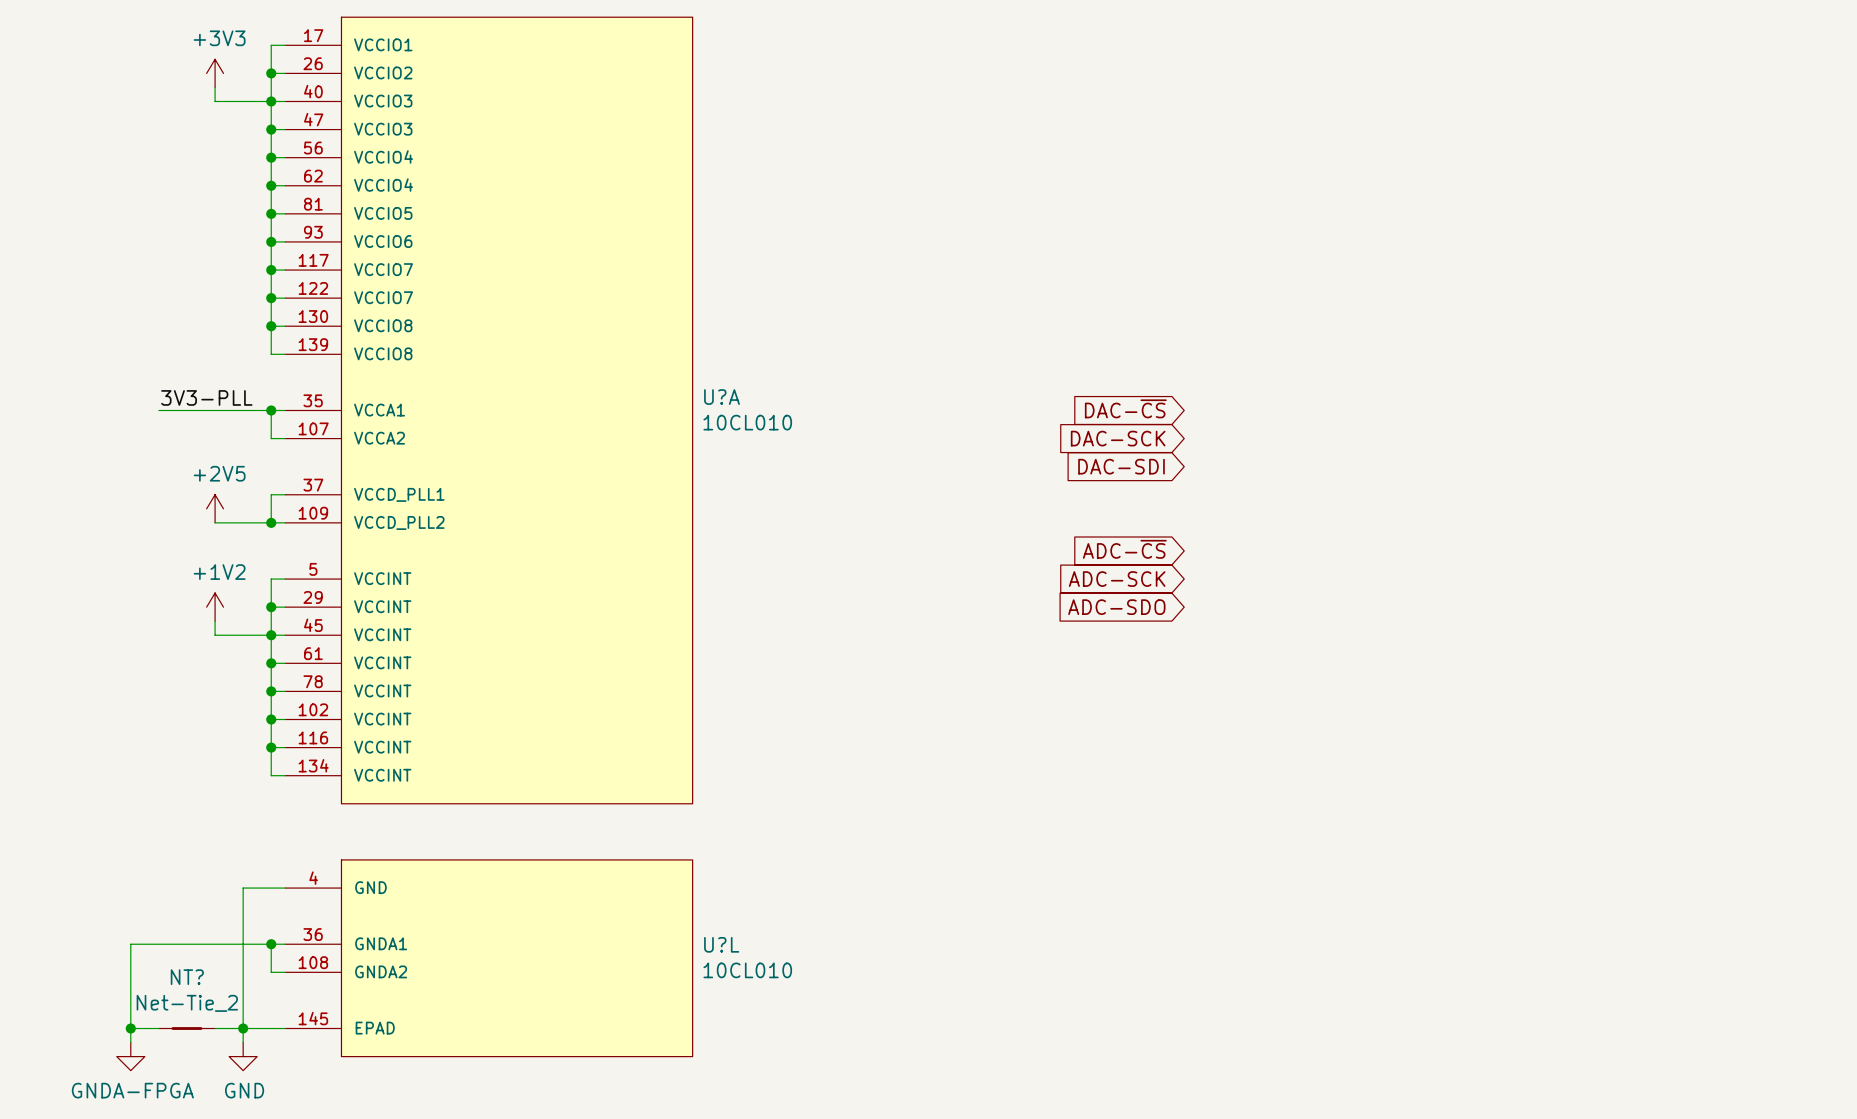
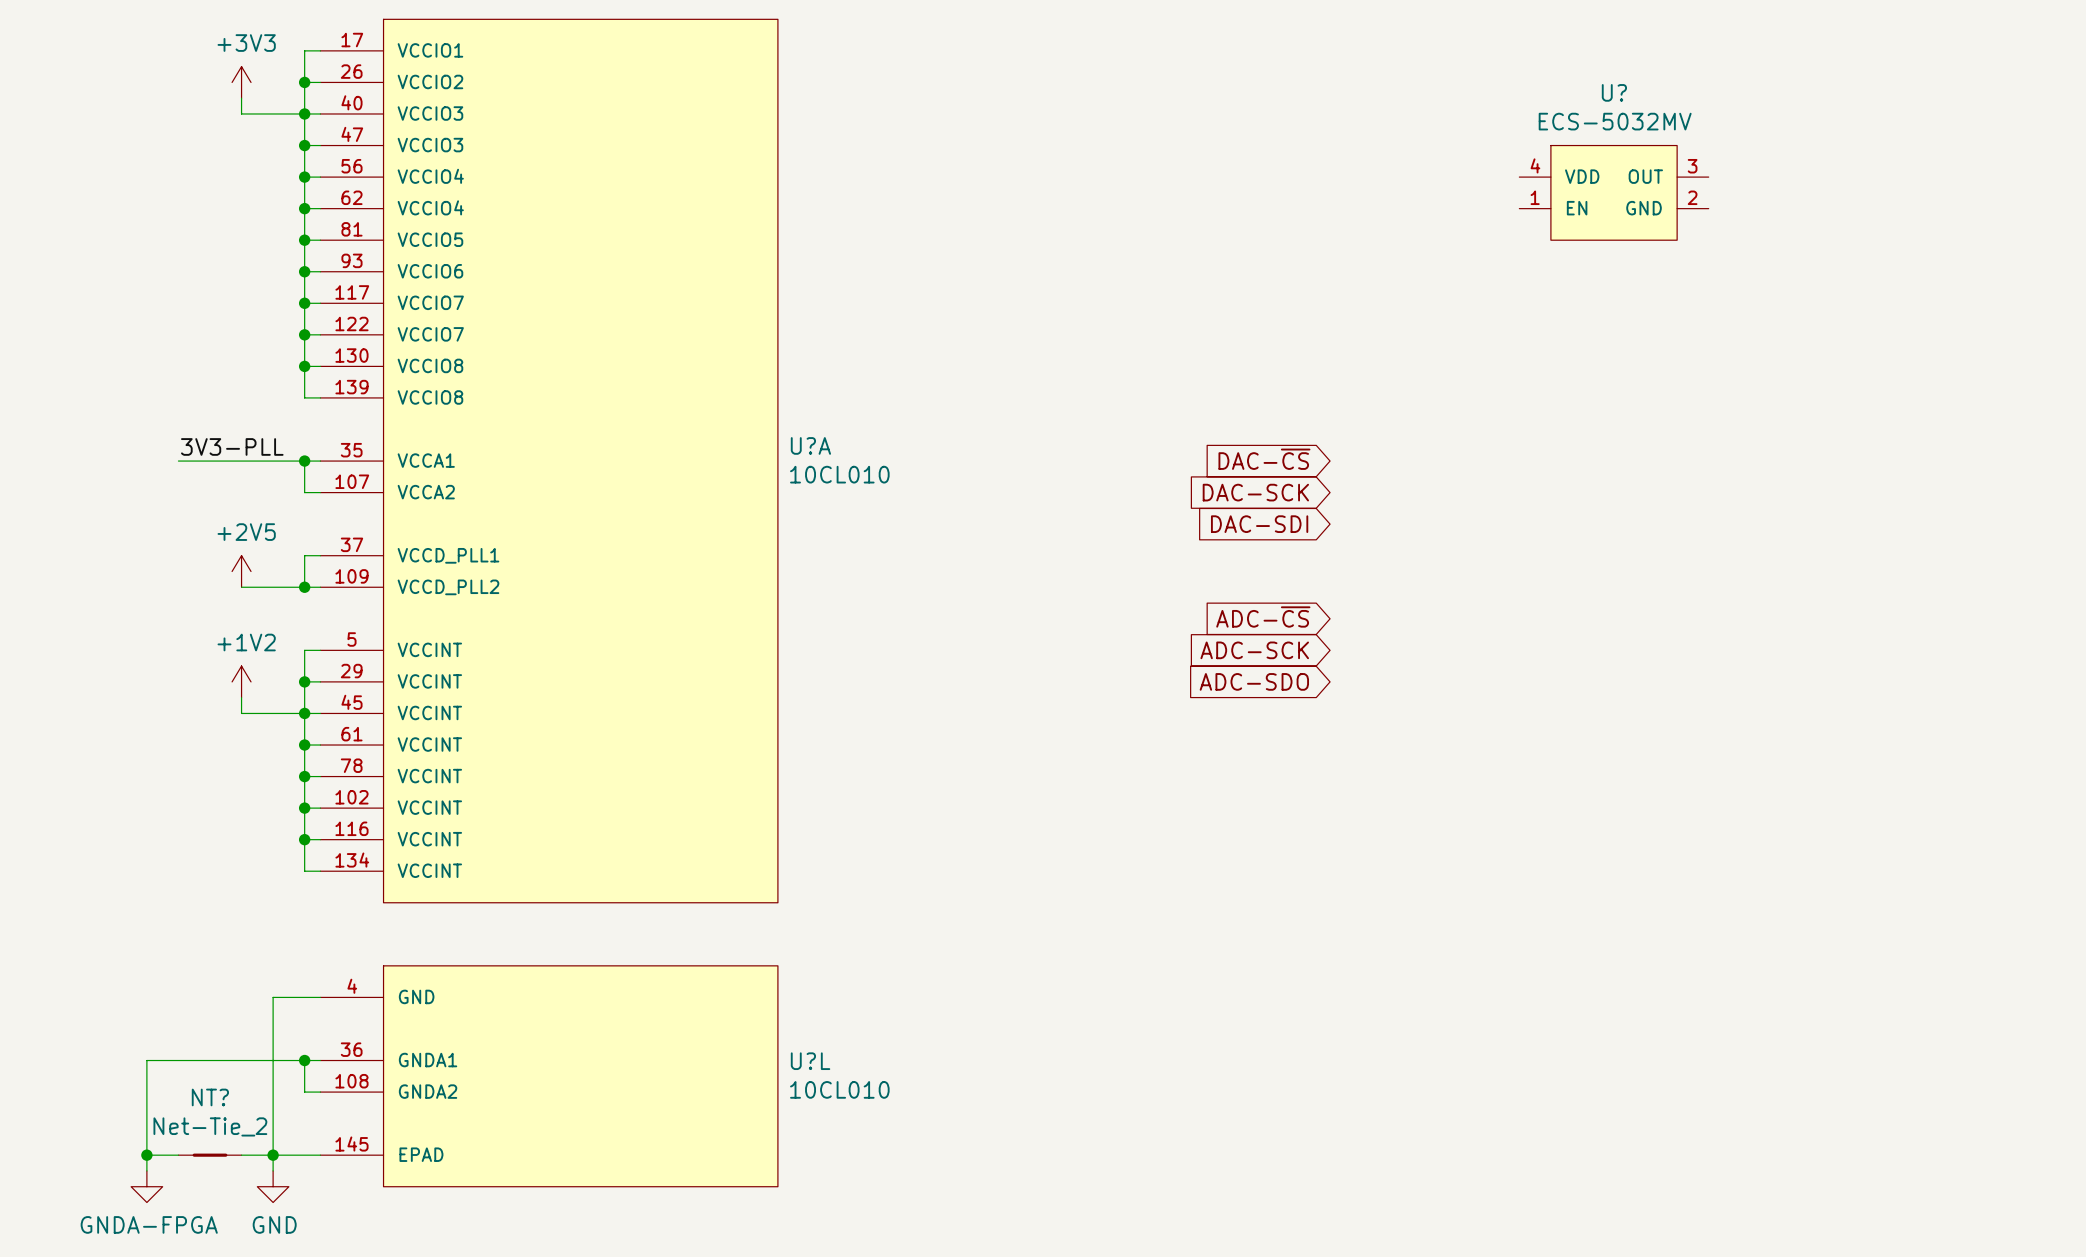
U?: none -> ECS-5032MV (1614, 192)

